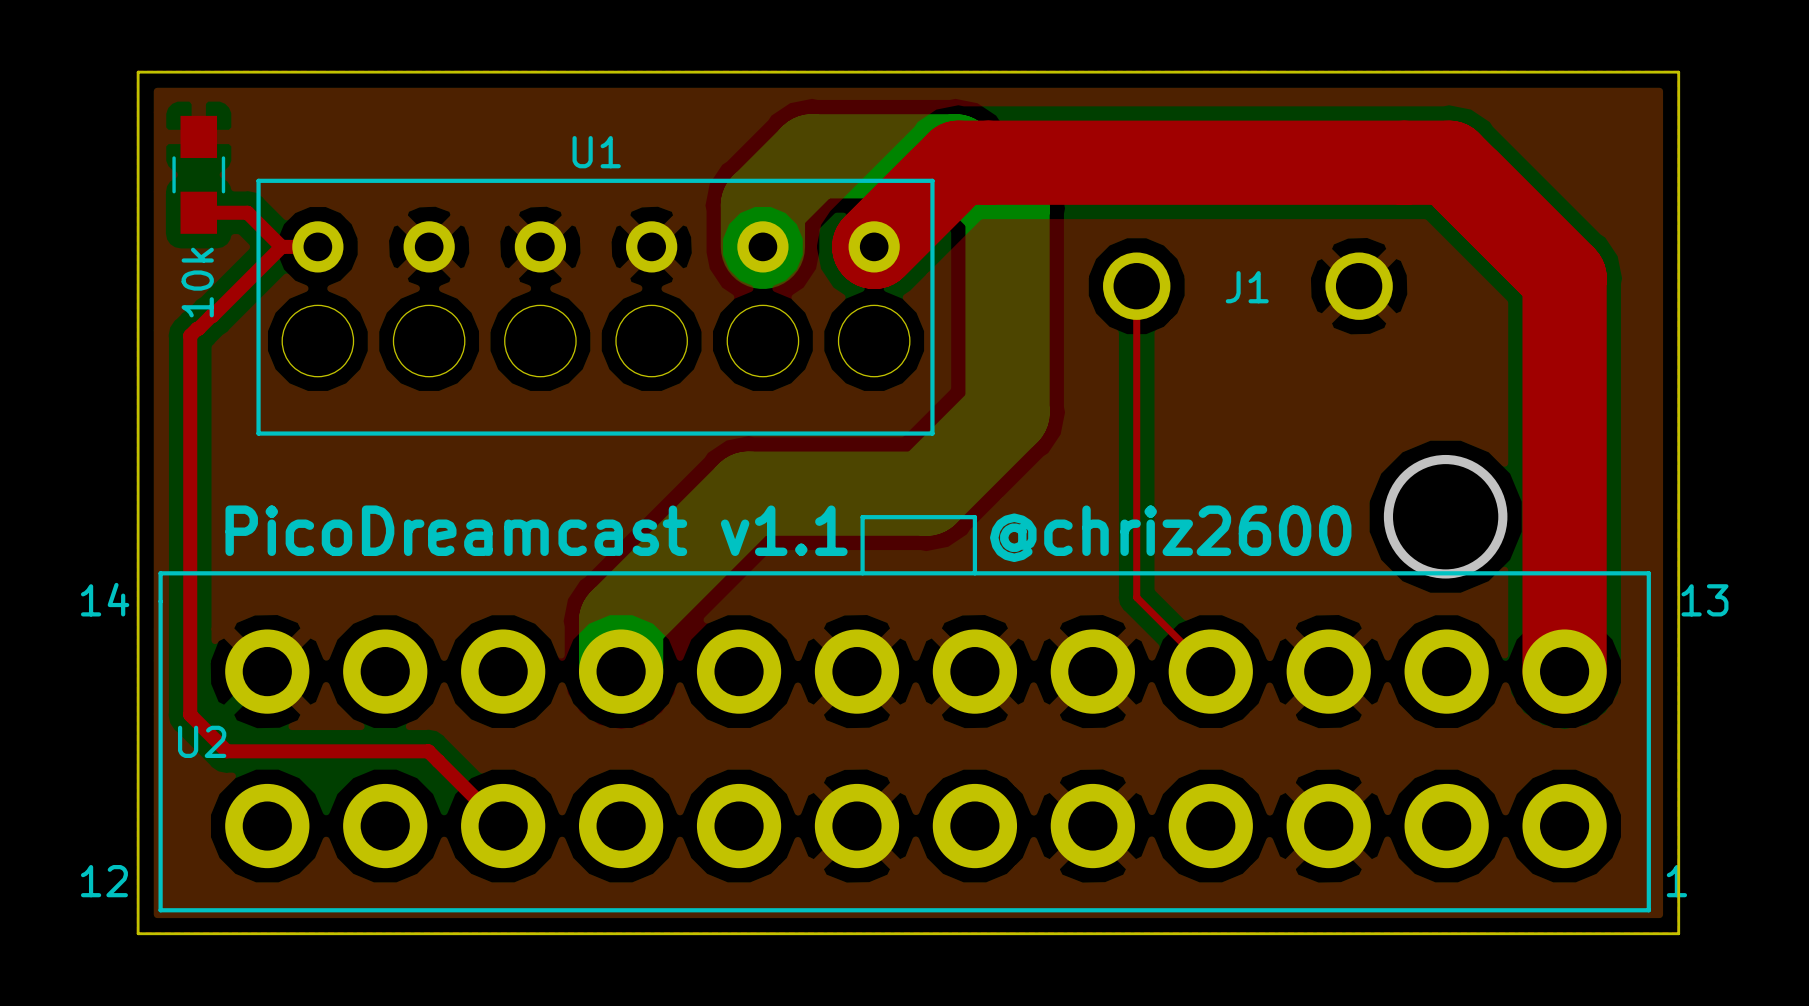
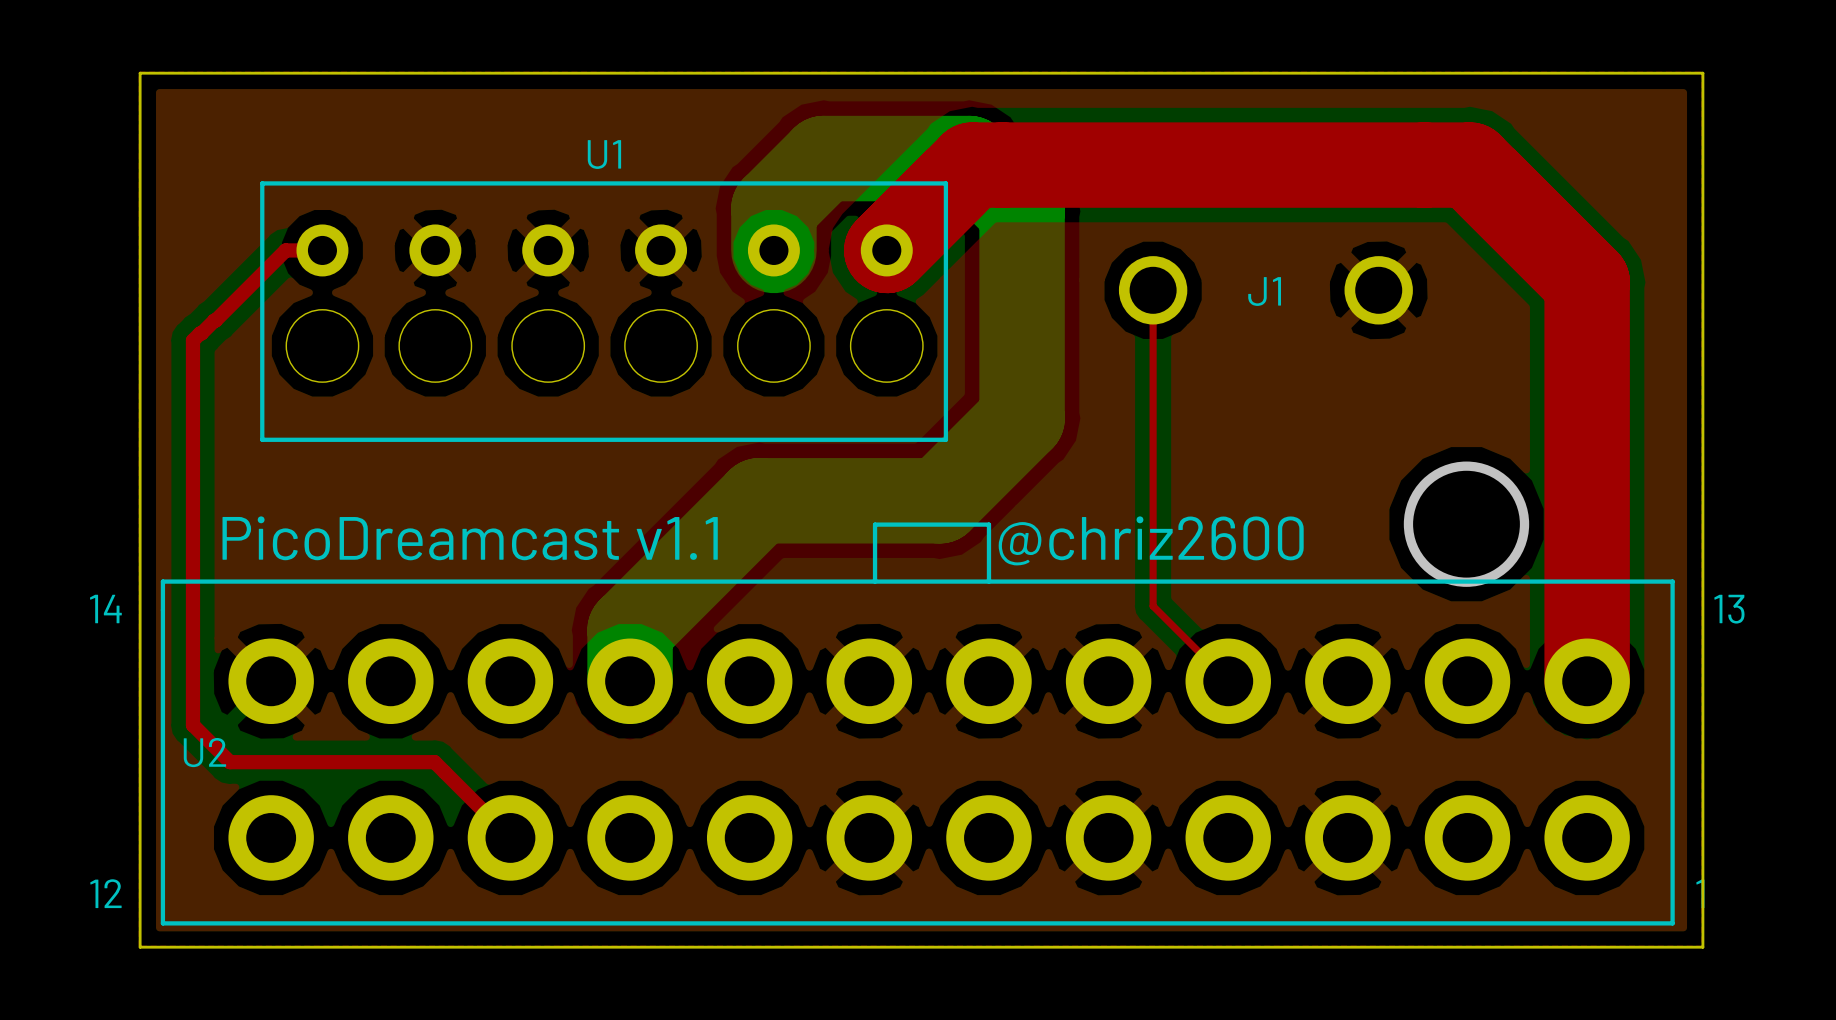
10k: (198, 174) -> none
top track: (198, 212) (247, 212) (281, 246) -> none

